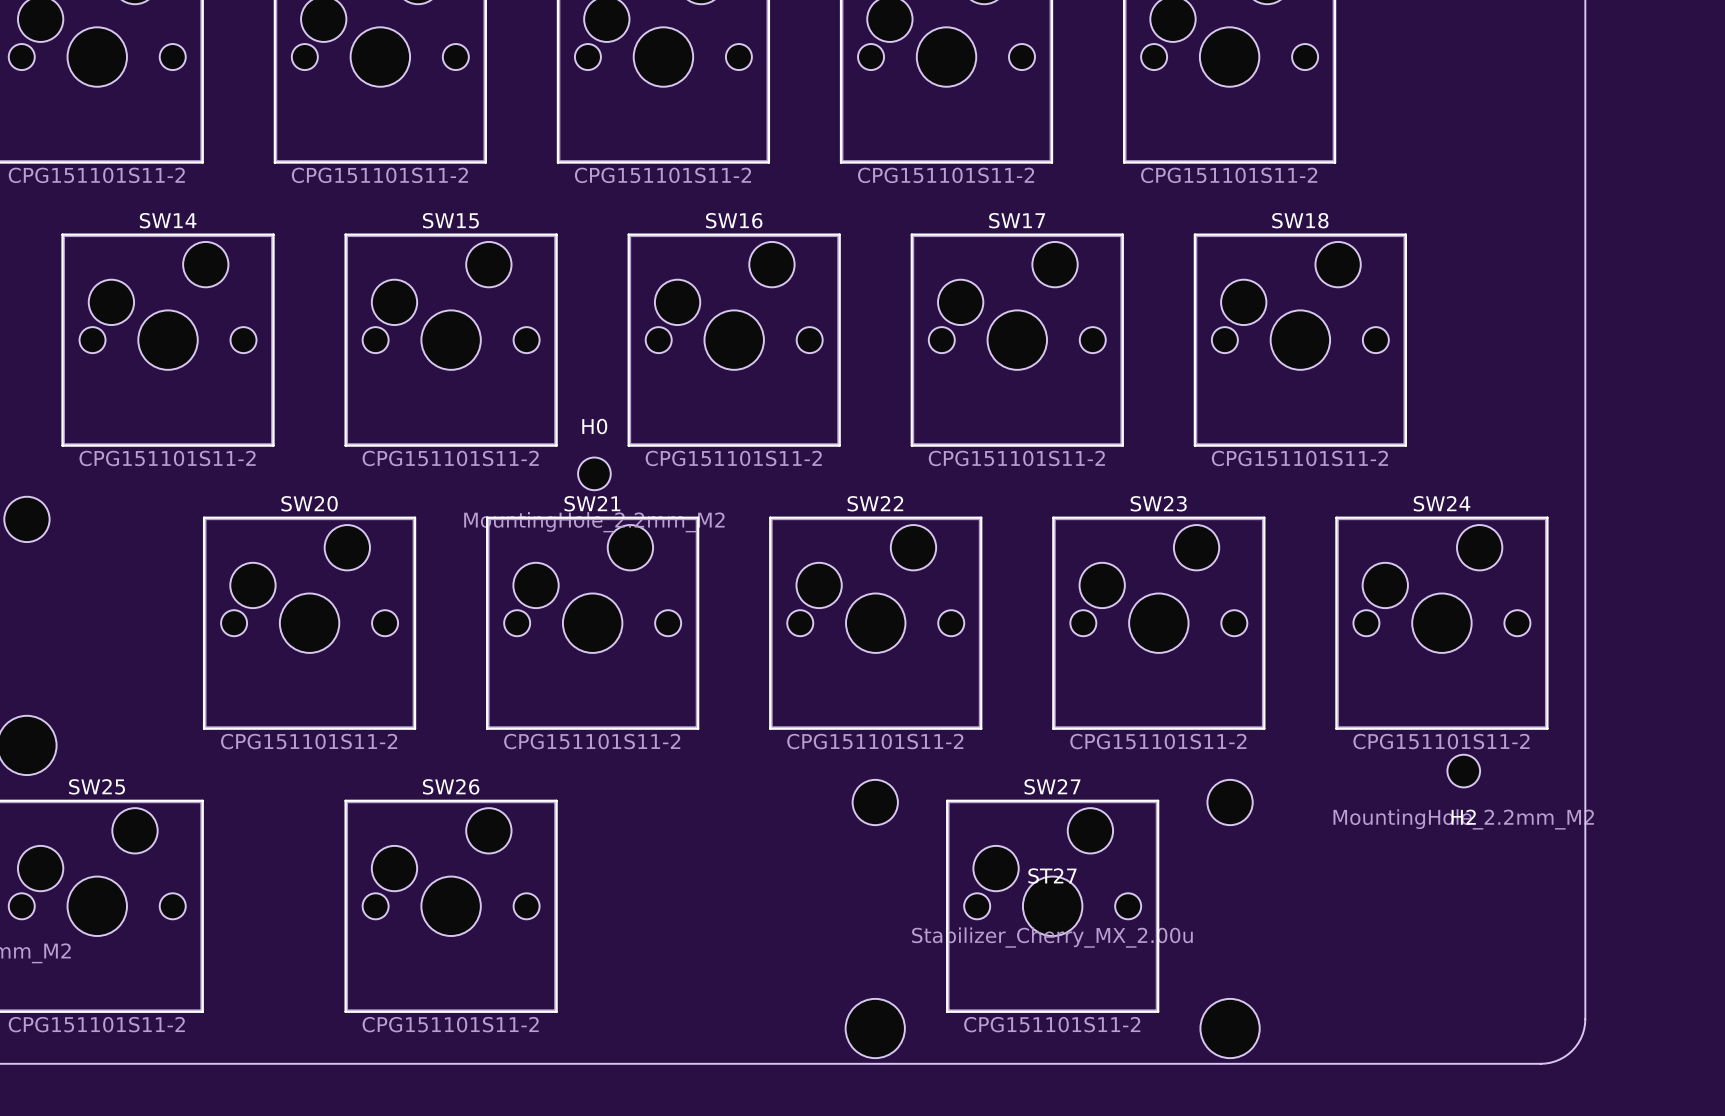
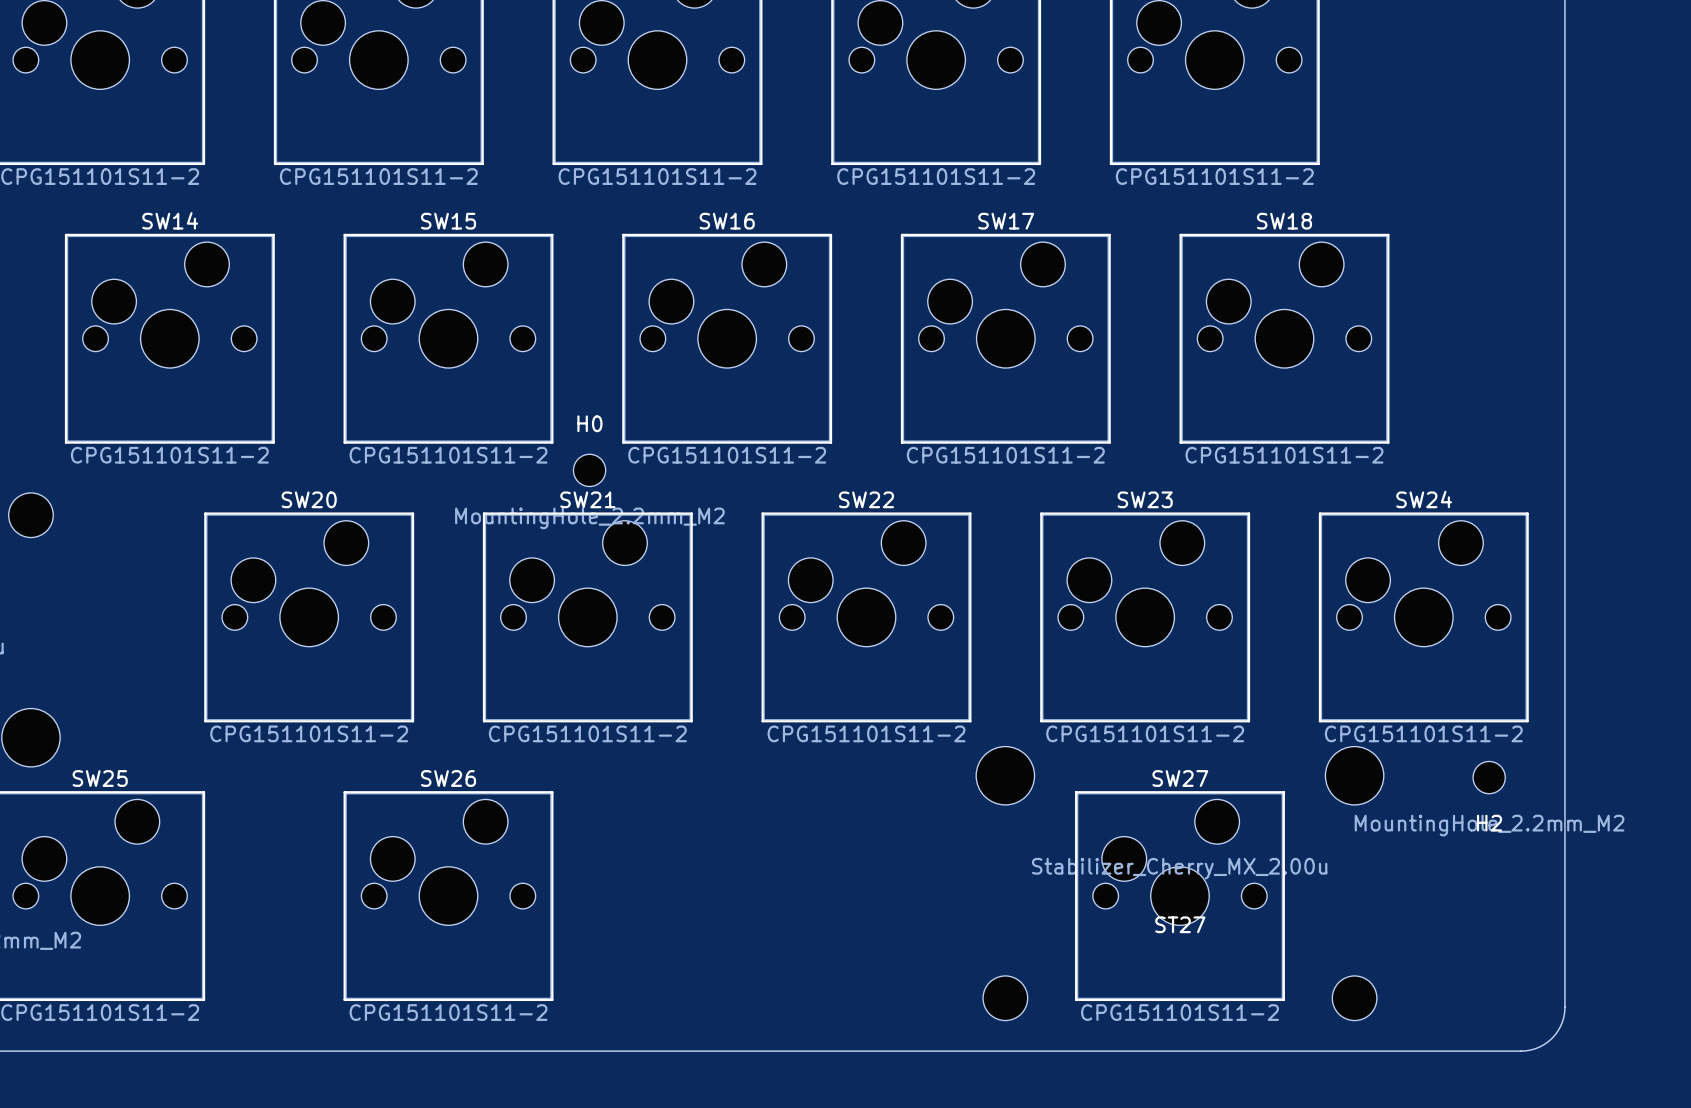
H2 position: (1463, 771) -> (1489, 777)
SW27 position: (1052, 906) -> (1179, 896)
ST27 rotation: 0° (1052, 919) -> 180° (1179, 883)

